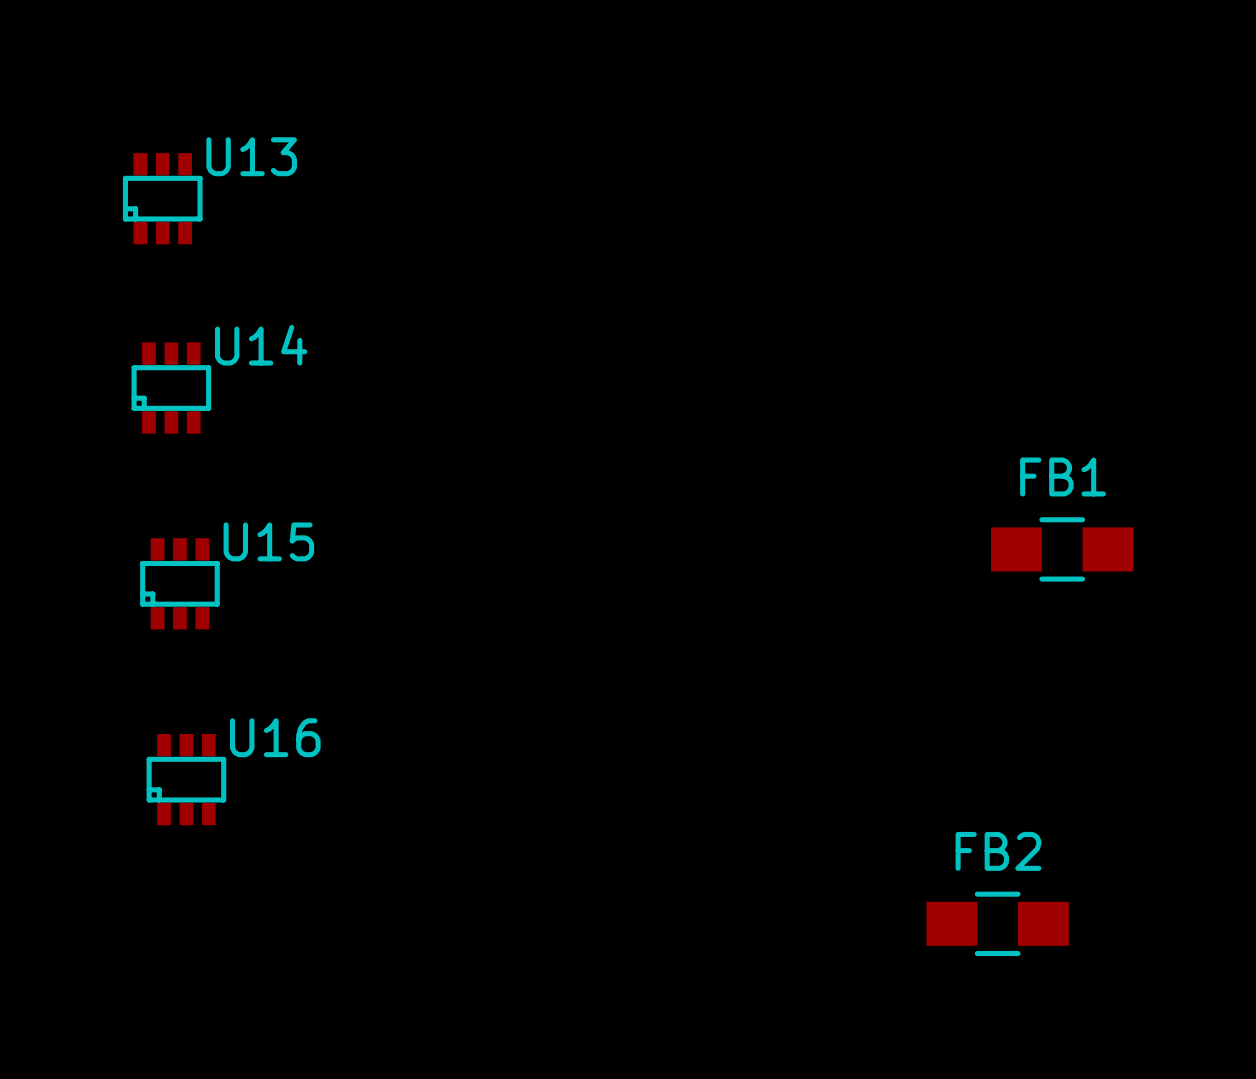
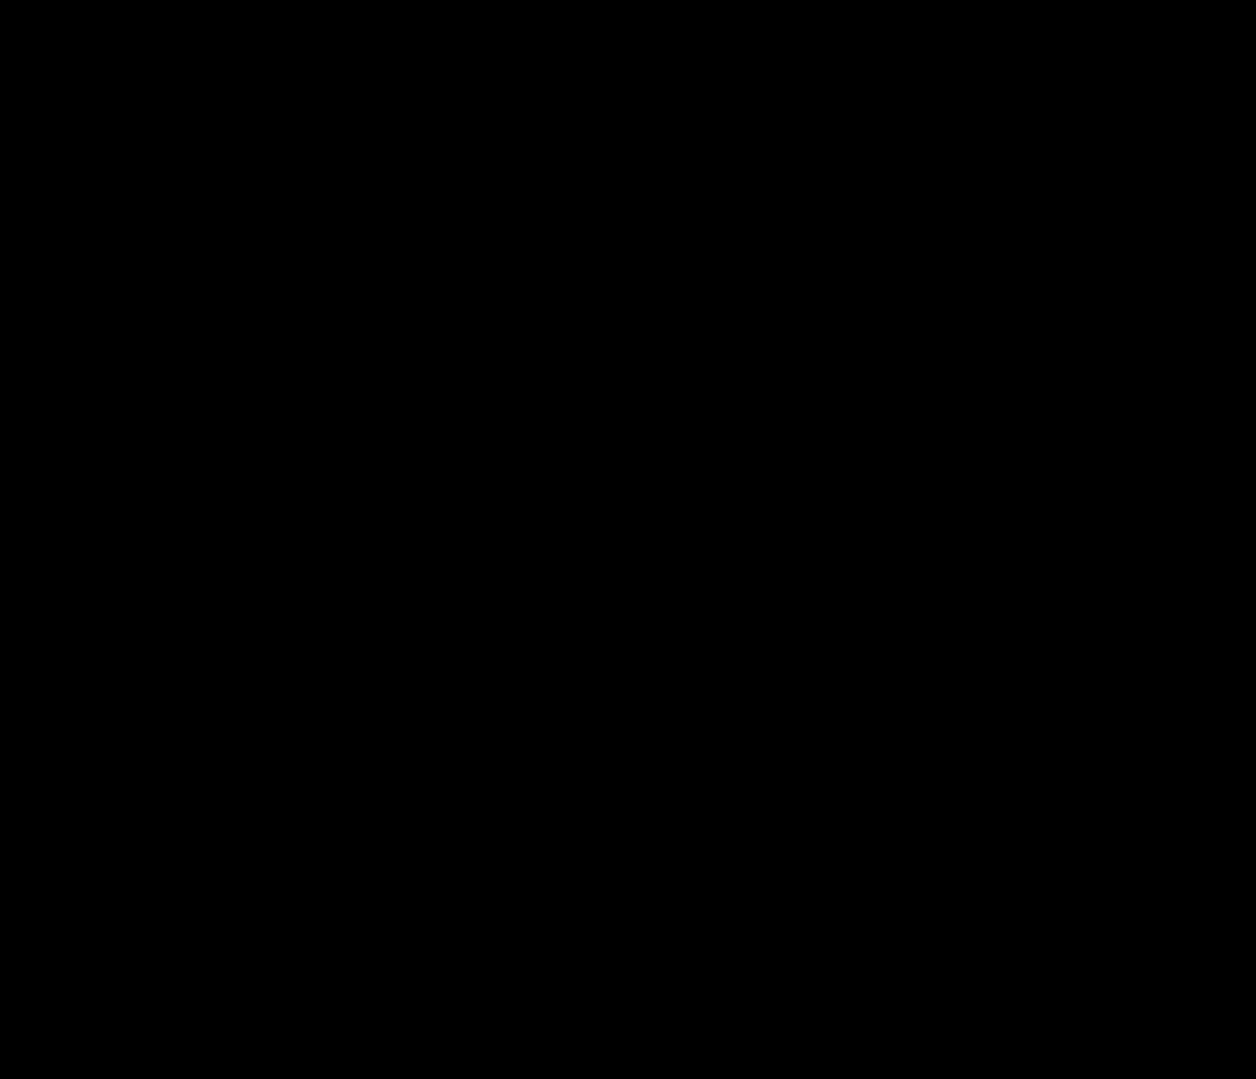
U13: (162, 198) -> none
U14: (171, 388) -> none
FB1: (1062, 549) -> none
U15: (179, 583) -> none
U16: (186, 779) -> none
FB2: (997, 923) -> none

